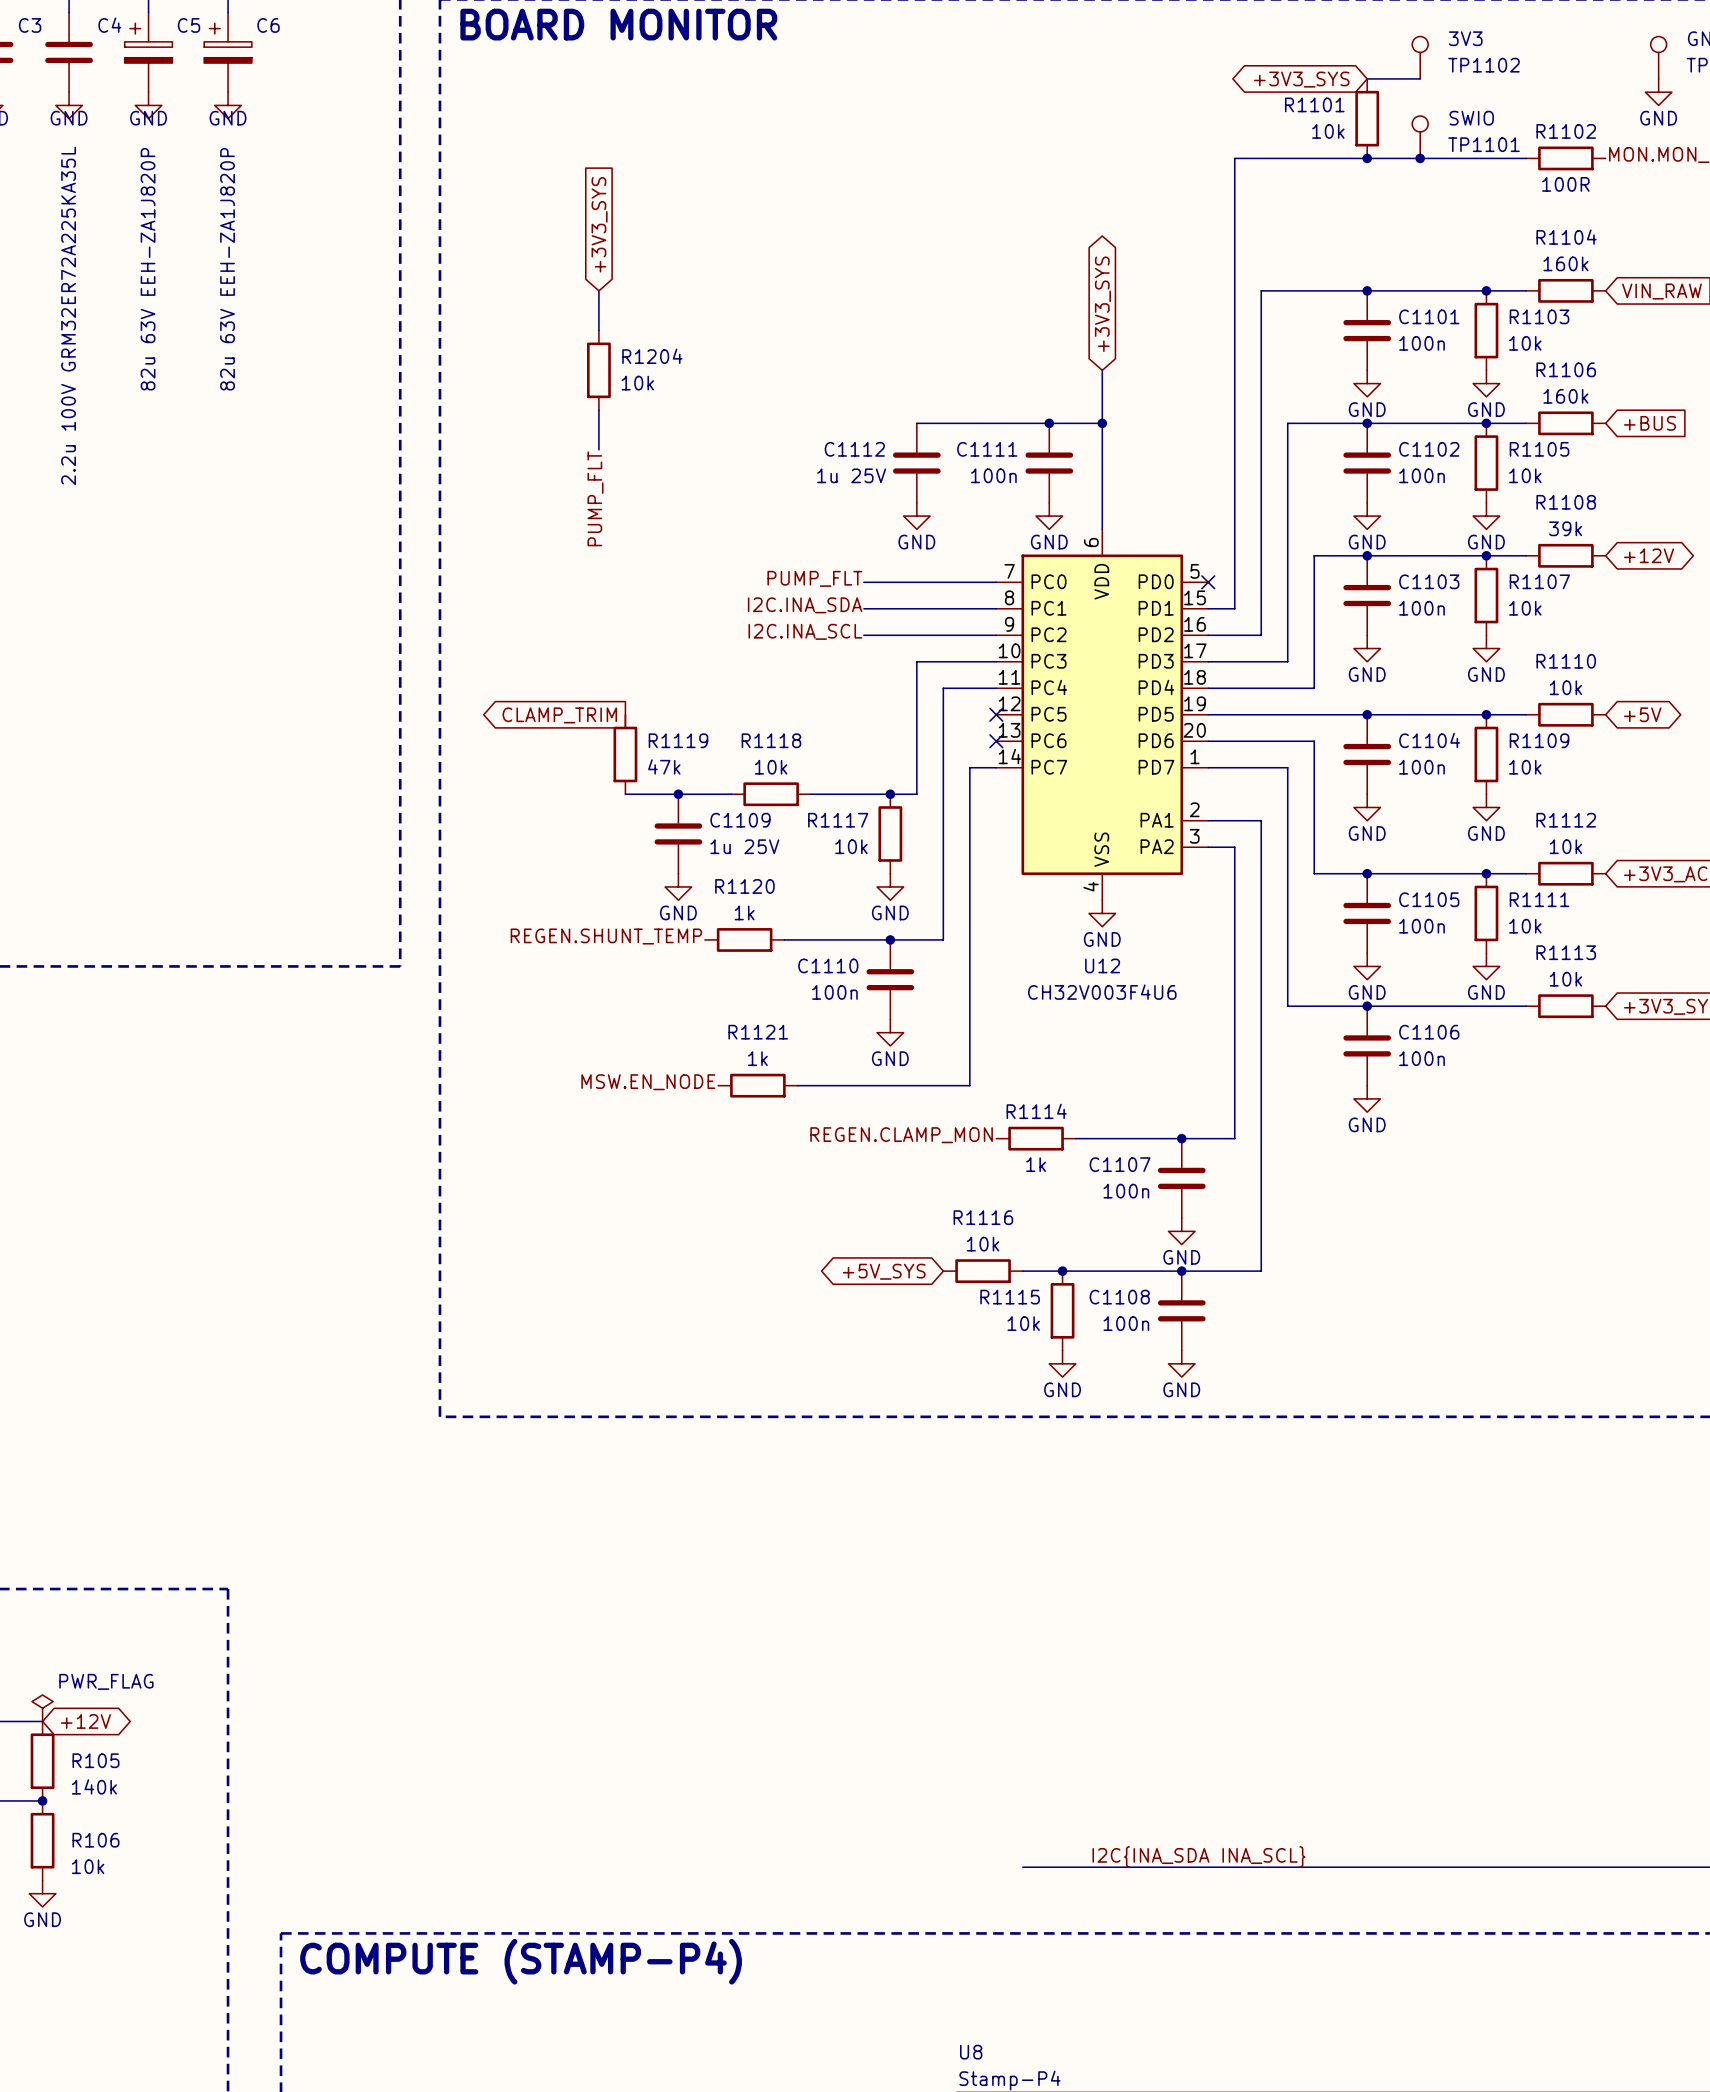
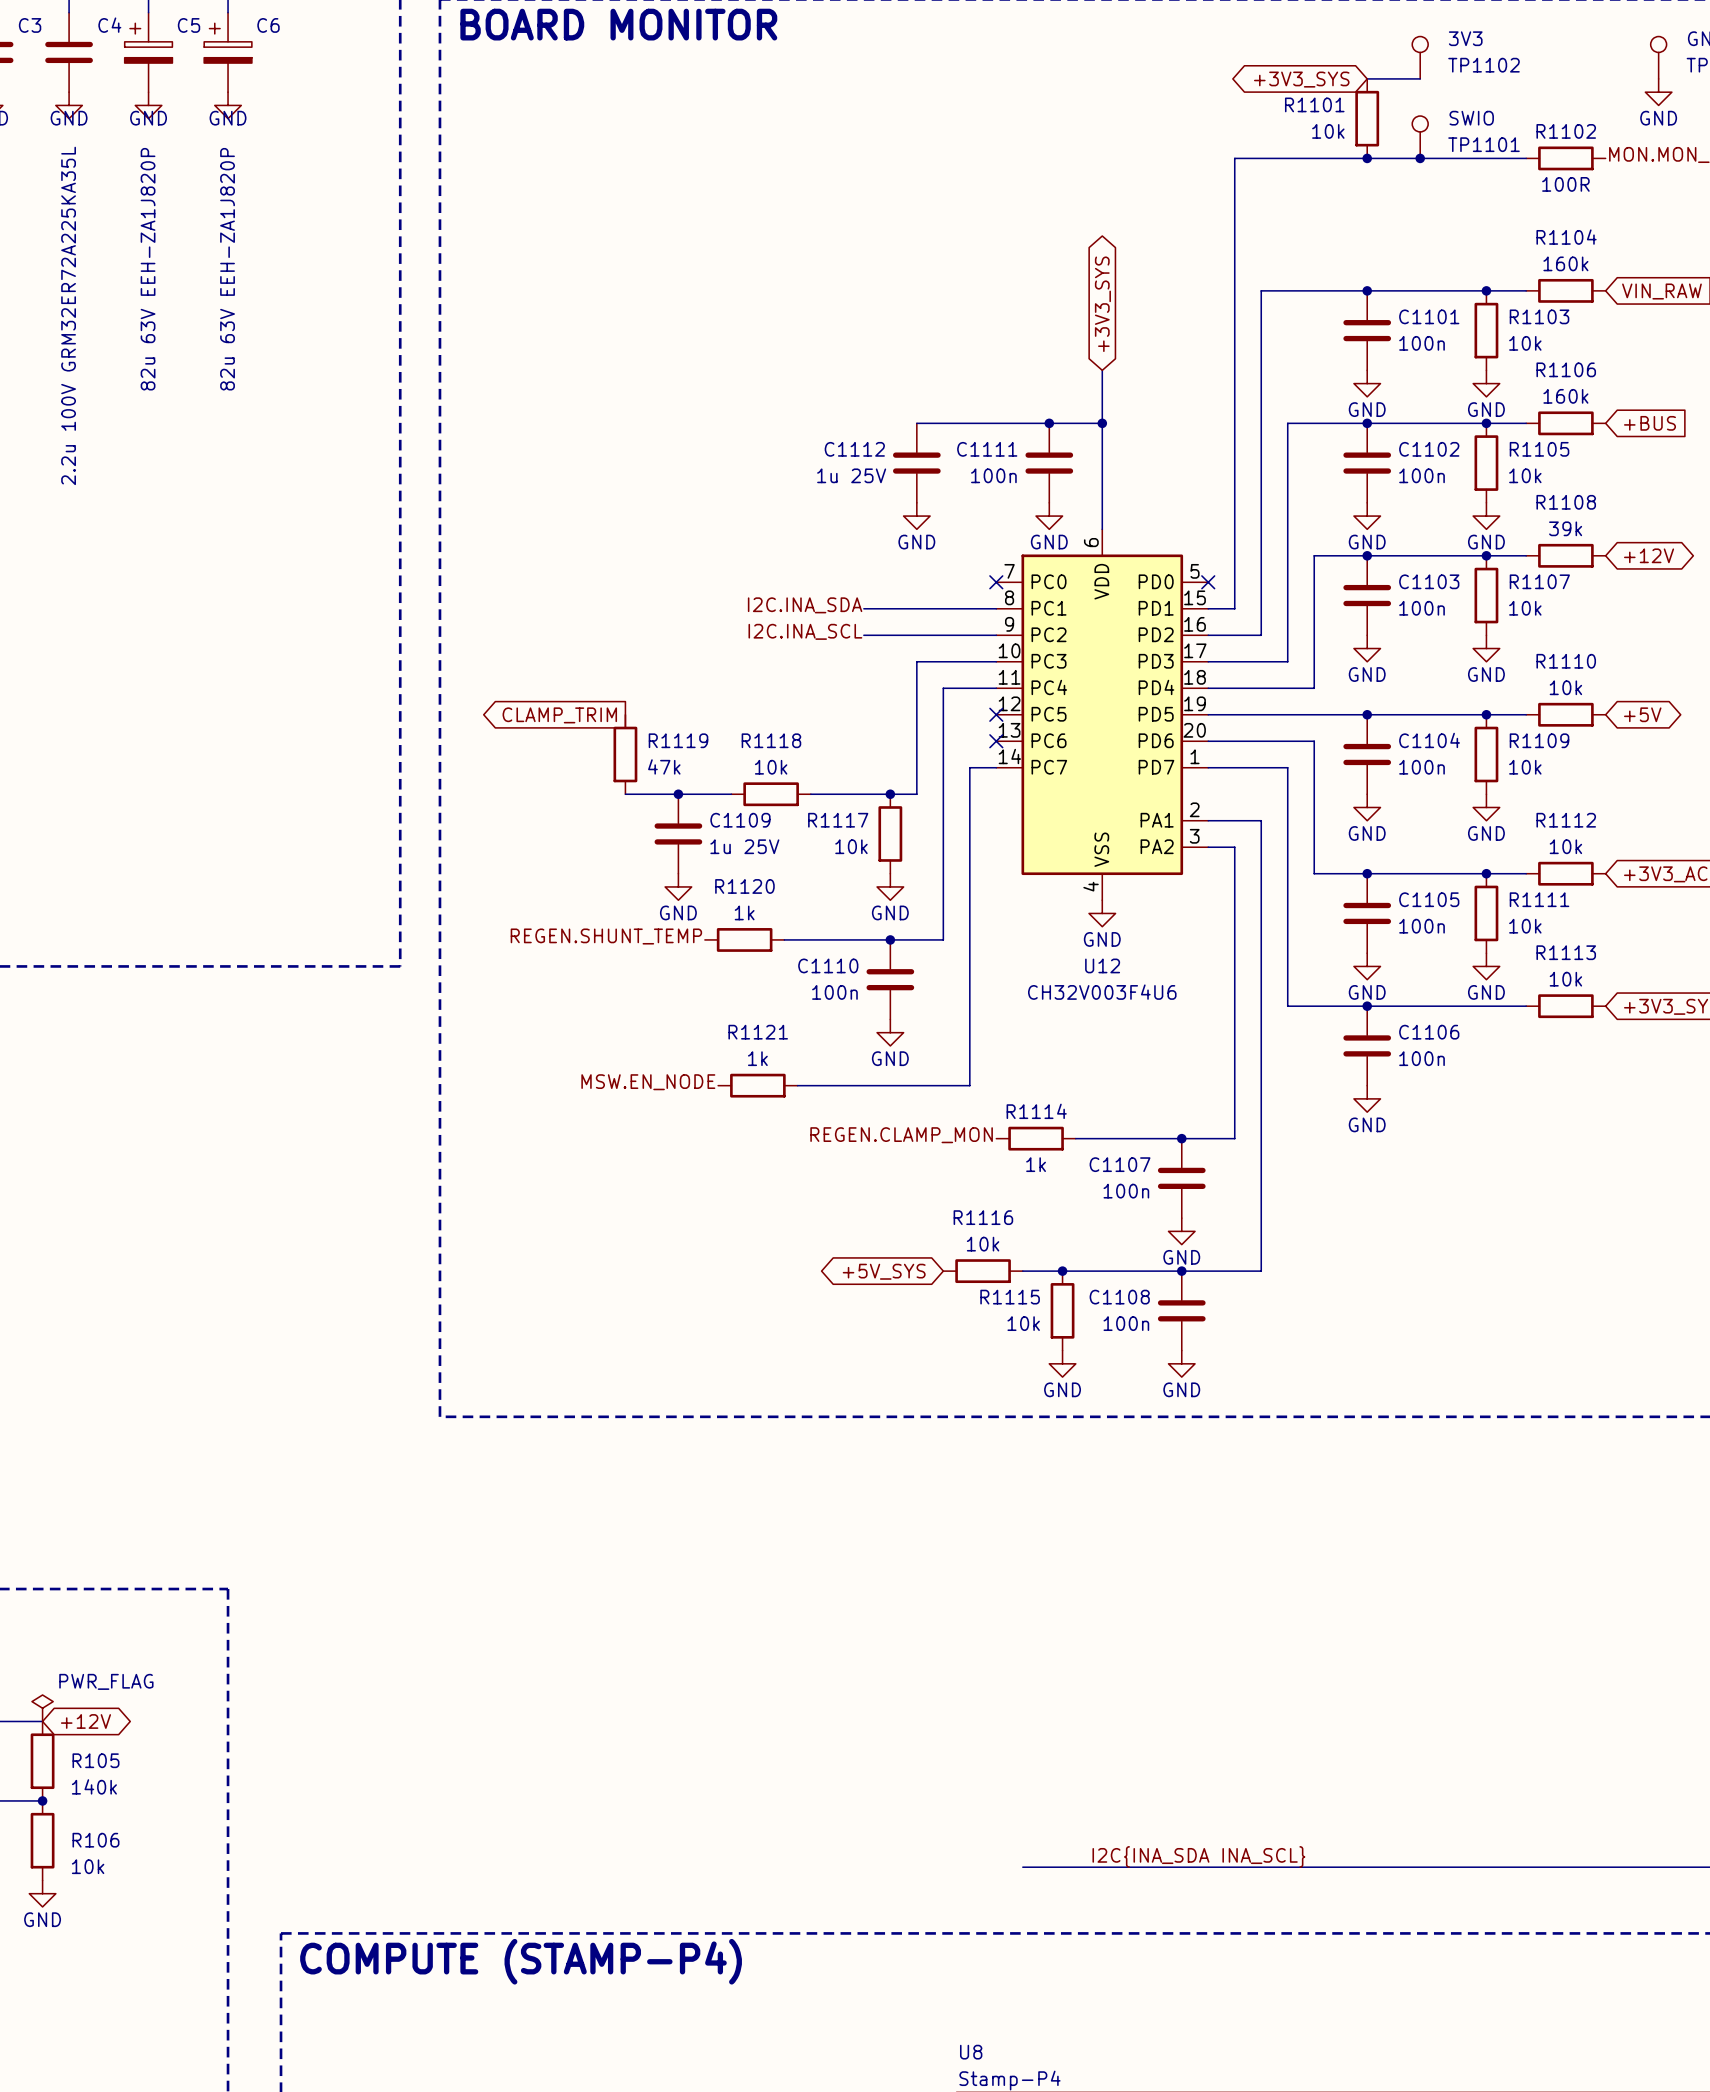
global label: +3V3_SYS (599, 224) -> none
wire: (598, 290) (598, 330) -> none
R1204: 10k (598, 370) -> none
wire: (598, 410) (598, 449) -> none
label: PUMP_FLT (595, 498) -> none
label: PUMP_FLT (814, 578) -> none
wire: (863, 582) (996, 582) -> none
no-connect mark: none -> (996, 582)

